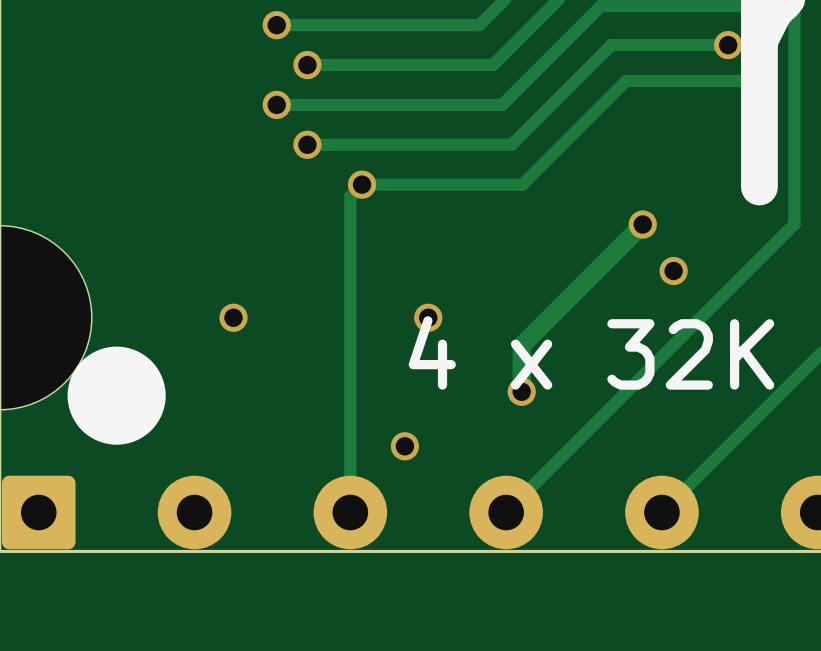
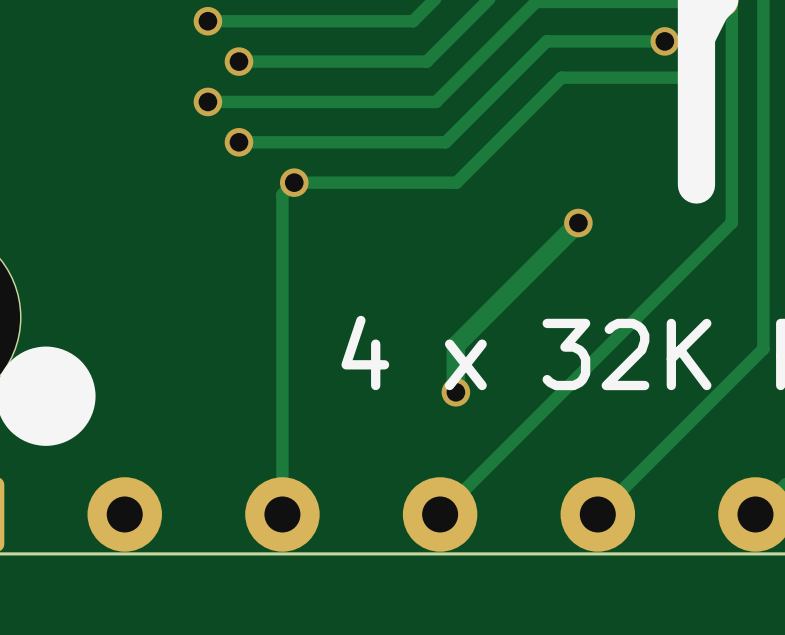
via: (673, 271) -> none
via: (233, 317) -> none
via: (428, 317) -> none
via: (404, 446) -> none

